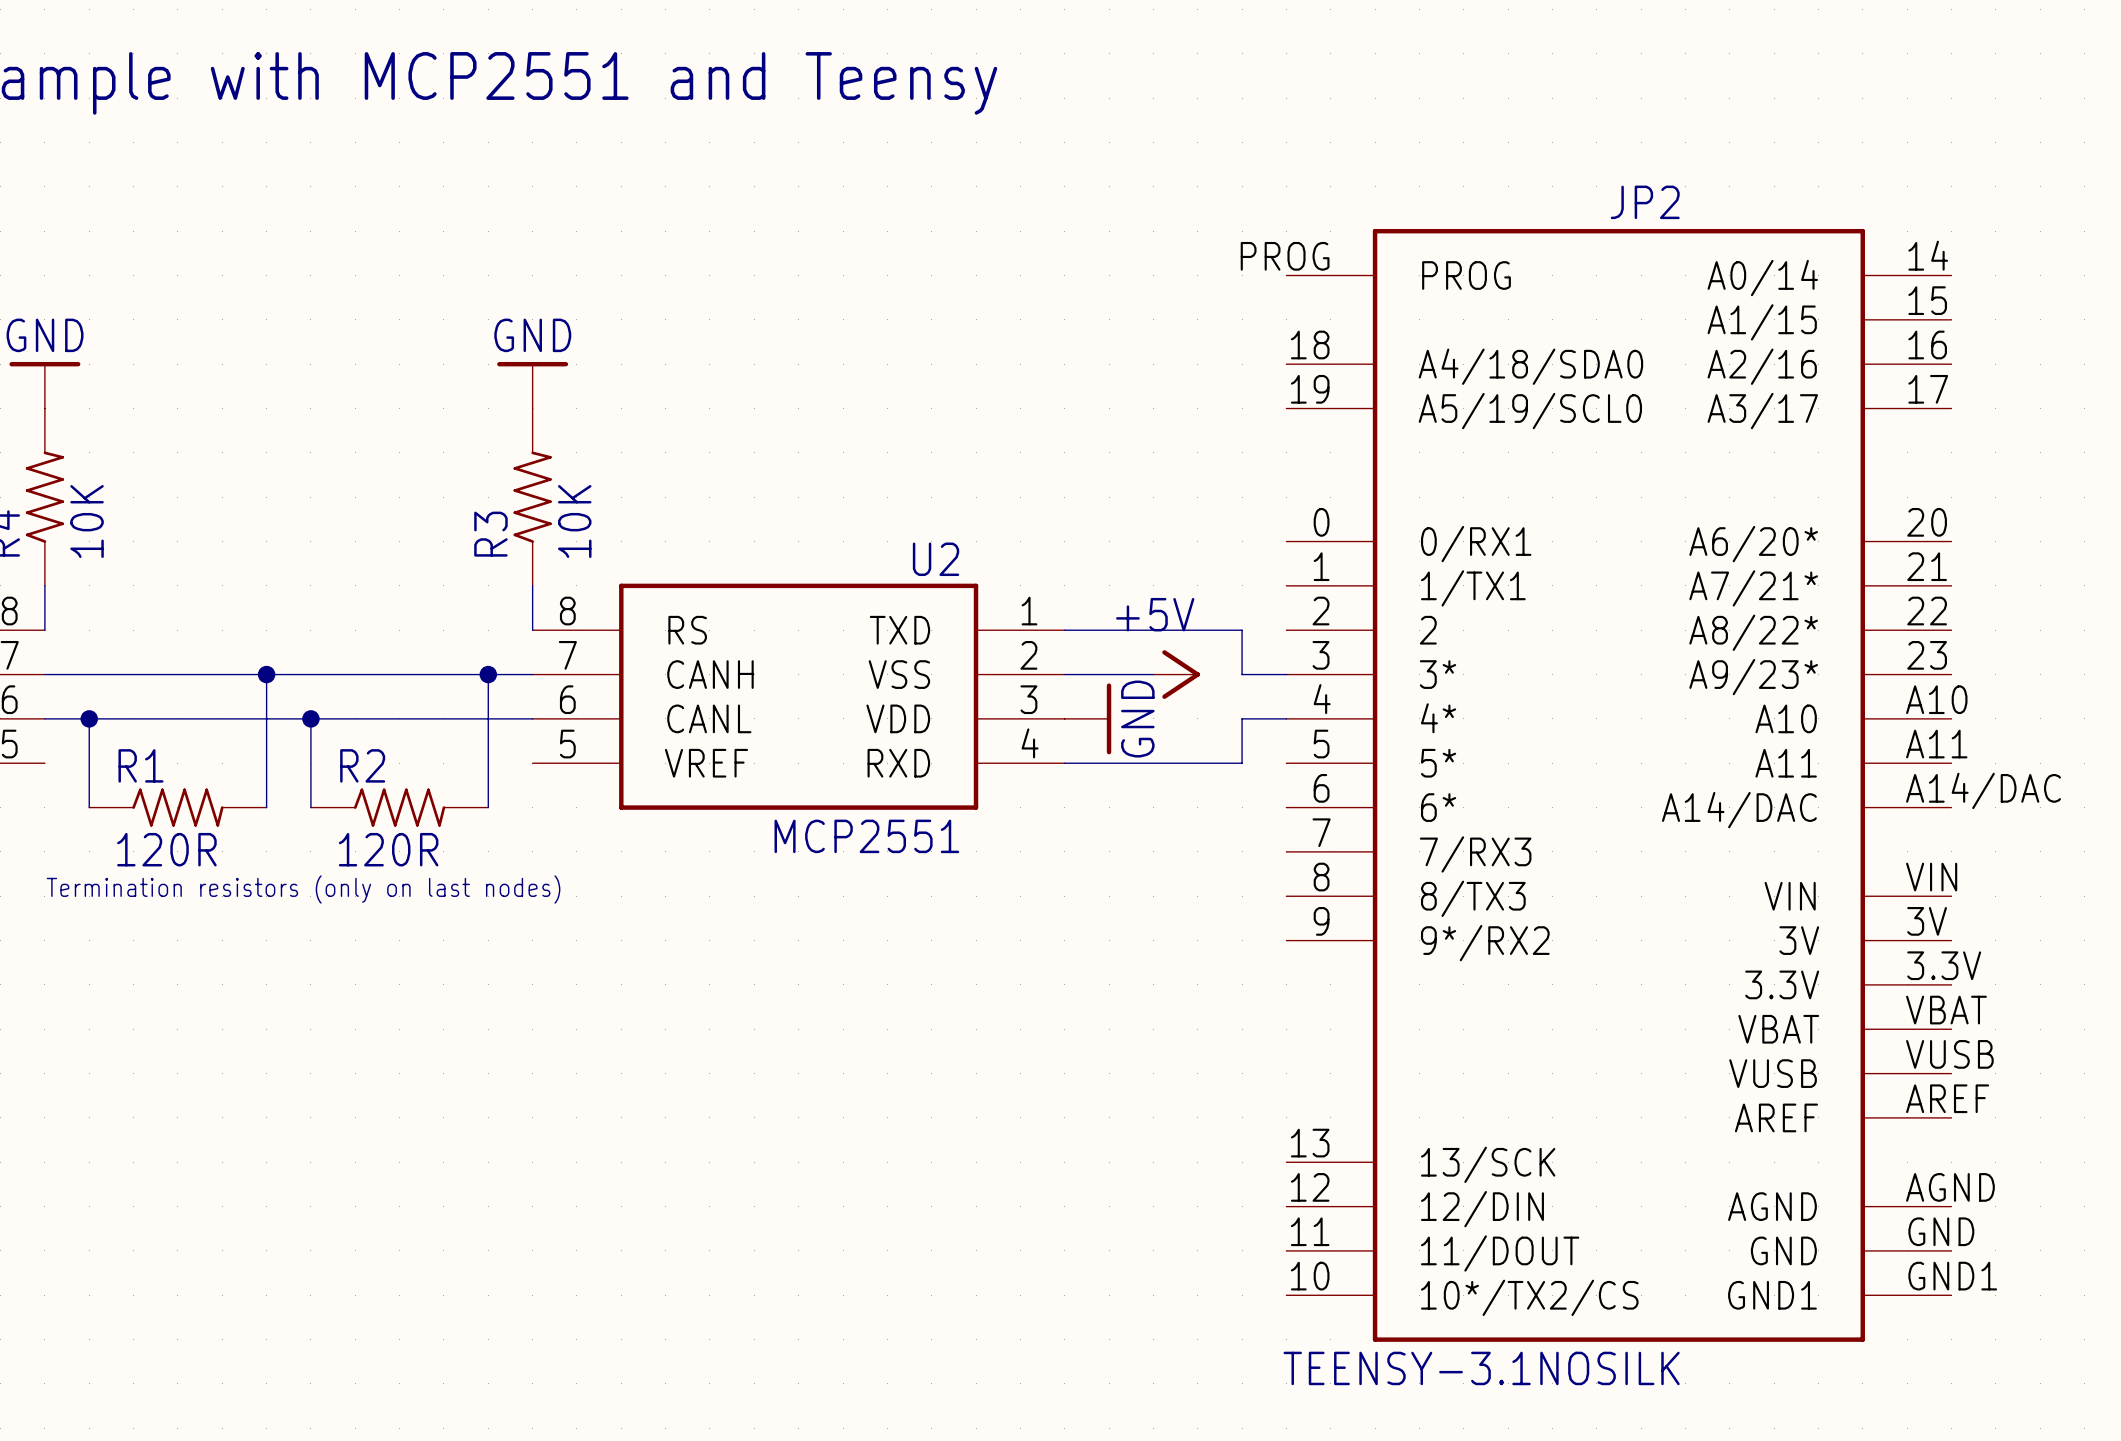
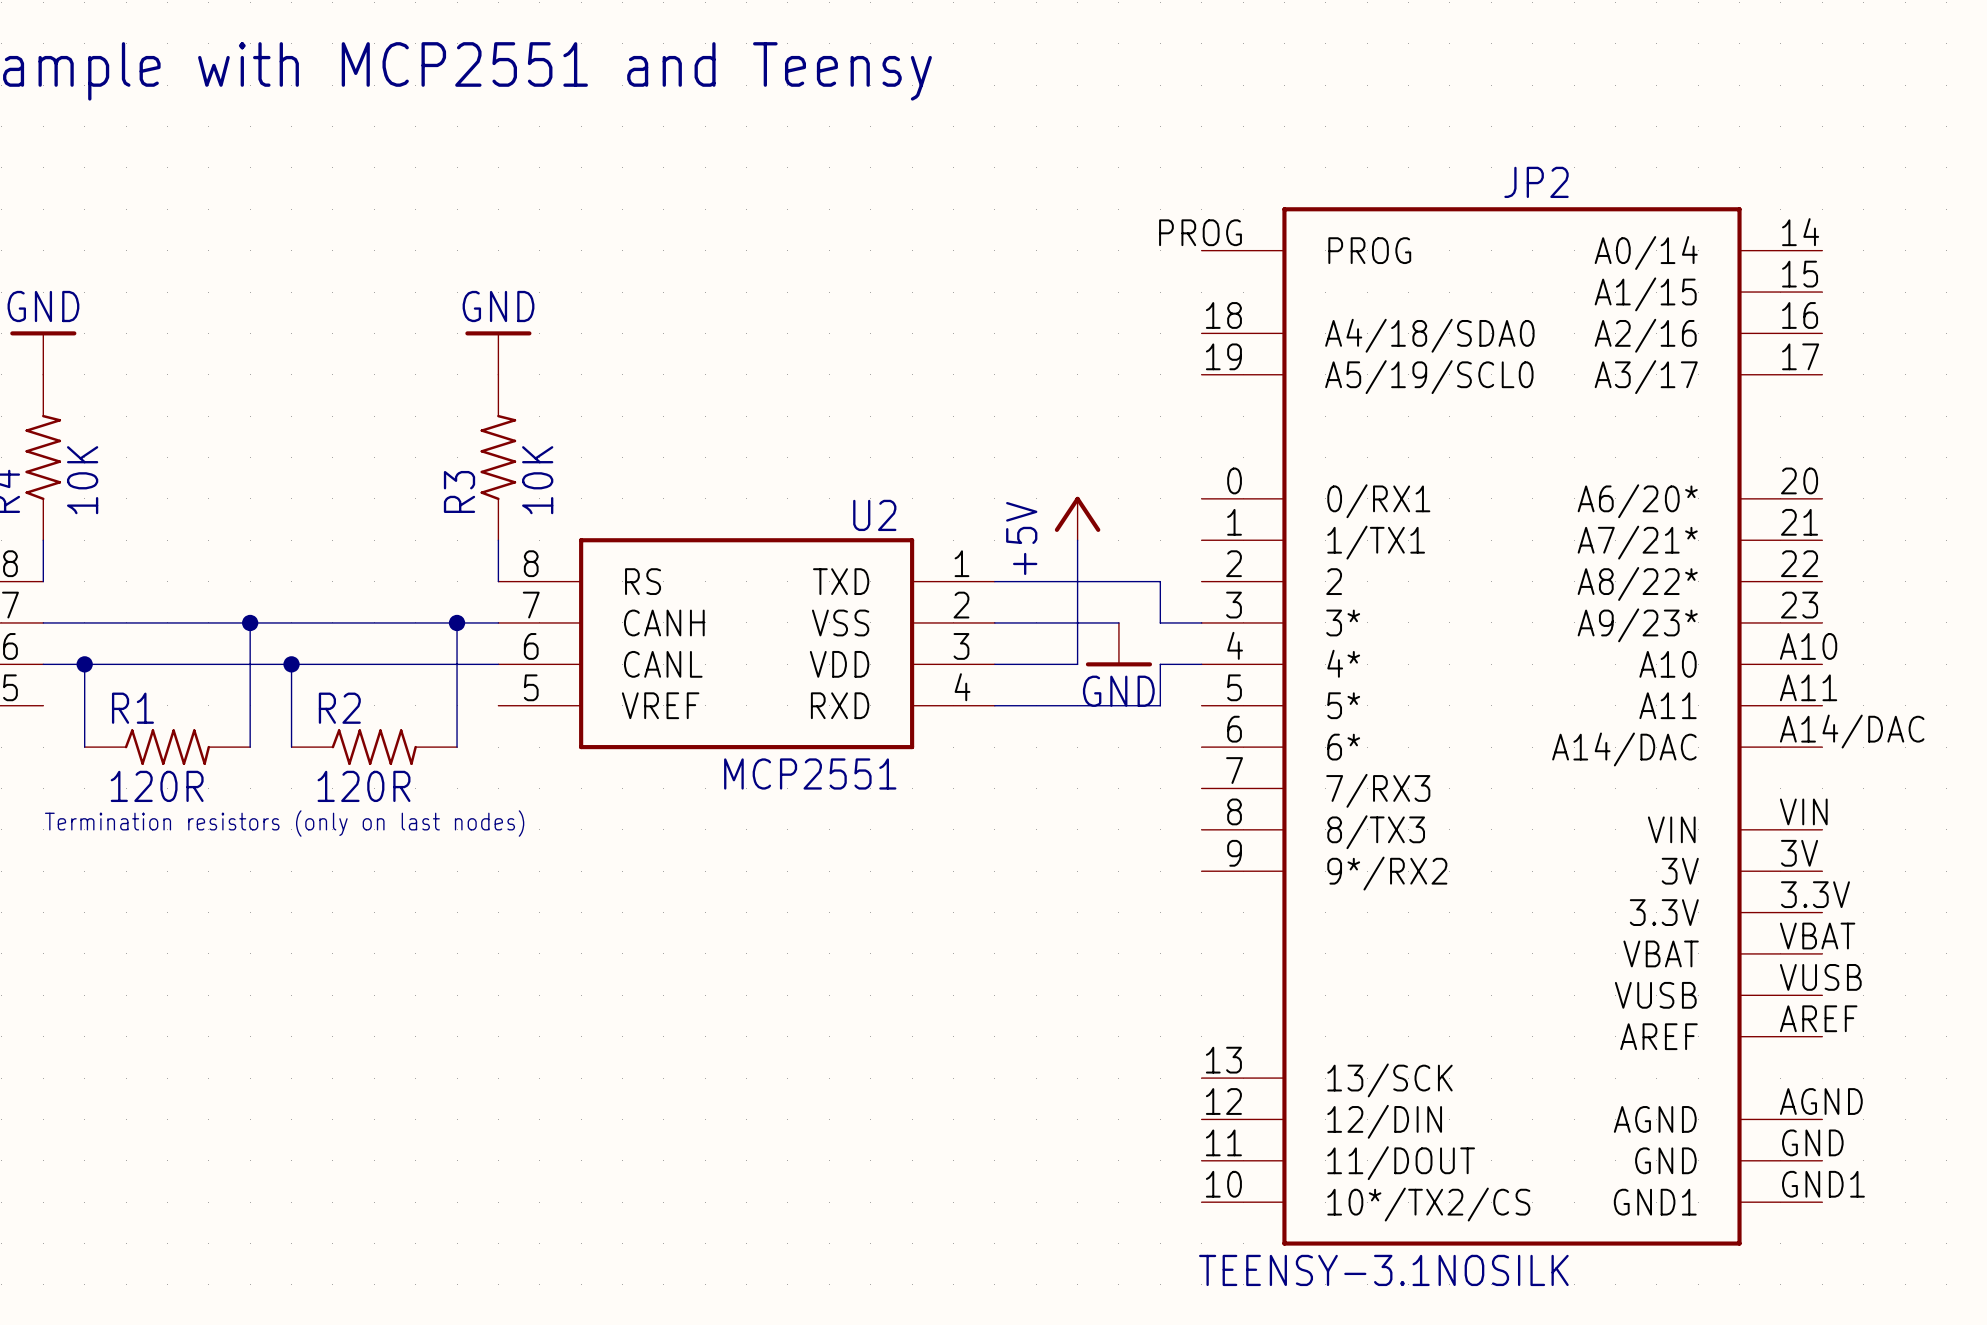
wire: none -> (1077, 540) (1077, 664) (994, 664)
power symbol position: +5V (1176, 674) -> +5V (1077, 518)
power symbol rotation: 0° (1181, 674) -> 90° counterclockwise (1077, 514)
power symbol position: GND (1087, 718) -> GND (1118, 644)
power symbol rotation: 0° (1109, 718) -> 90° clockwise (1118, 664)

